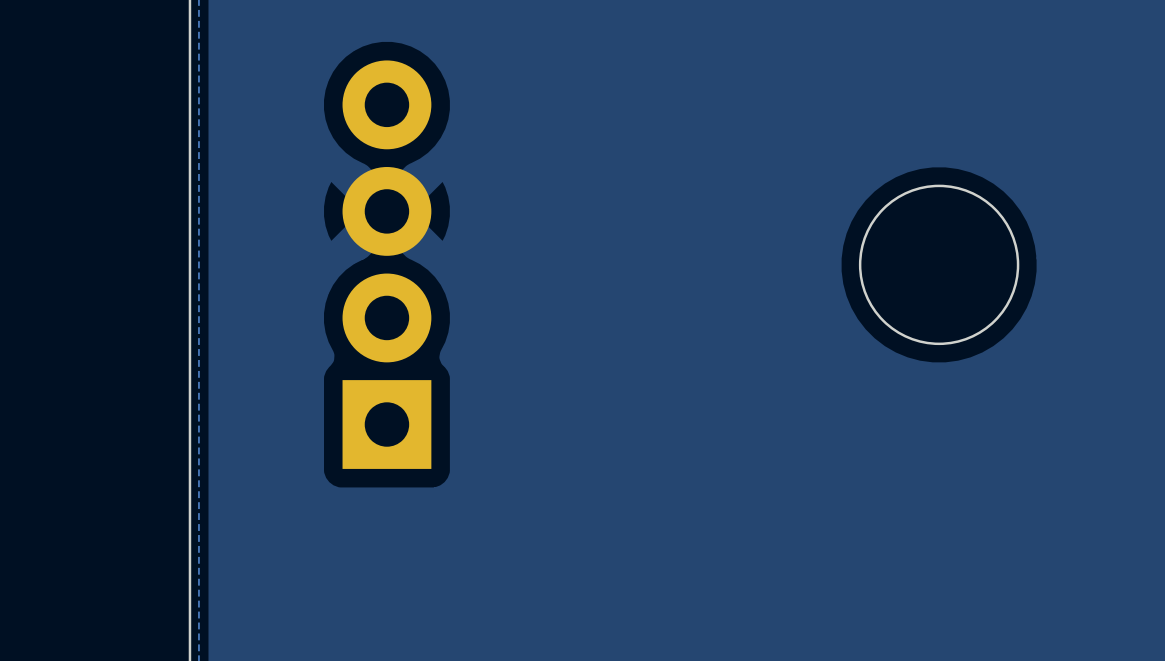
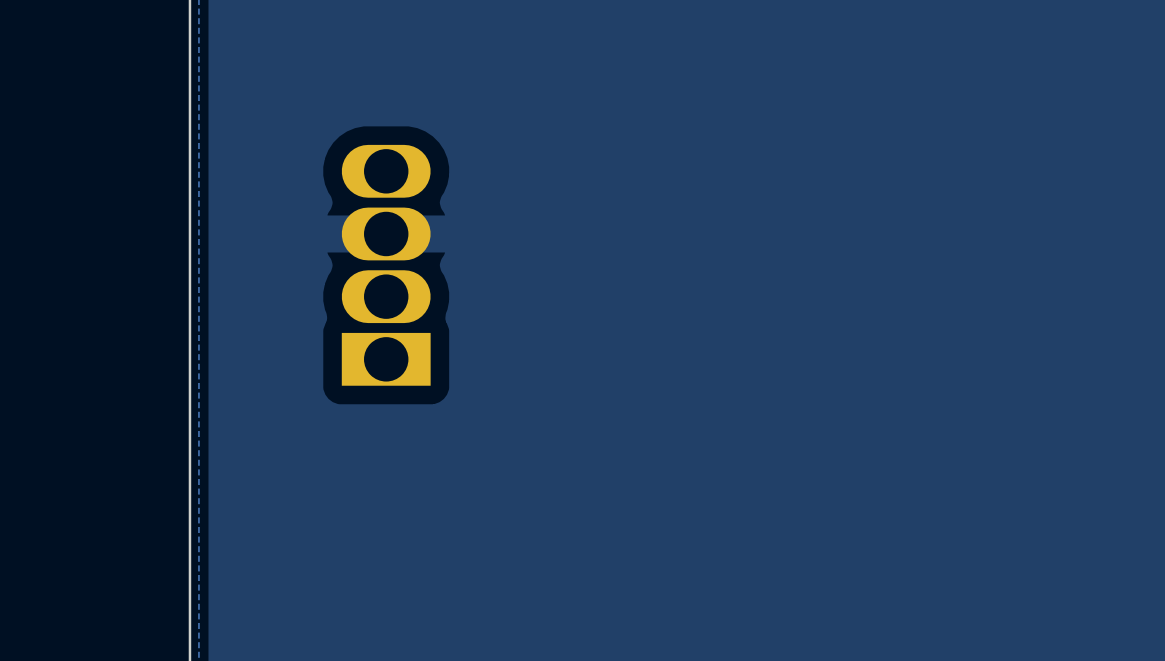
part footprint: [342, 60, 432, 469] -> [341, 144, 431, 386]
round board edge: [858, 184, 1020, 346] -> none

